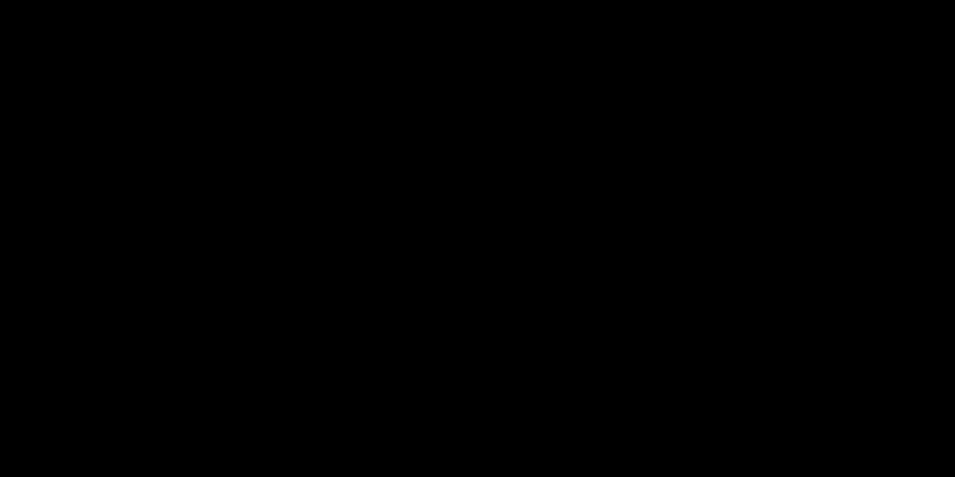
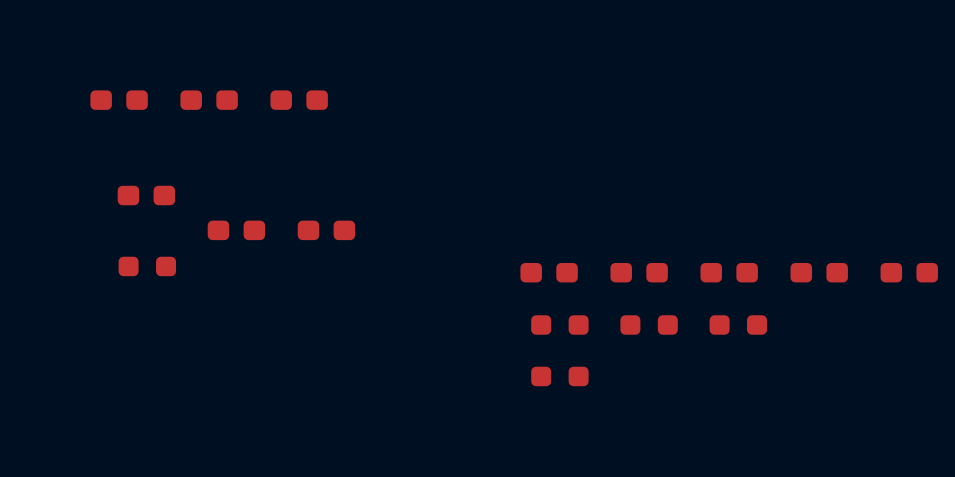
part: none -> (119, 100)
part: none -> (209, 100)
part: none -> (299, 100)
part: none -> (146, 195)
part: none -> (236, 230)
part: none -> (326, 230)
part: none -> (147, 266)
part: none -> (549, 272)
part: none -> (639, 272)
part: none -> (729, 272)
part: none -> (819, 272)
part: none -> (909, 272)
part: none -> (559, 324)
part: none -> (649, 324)
part: none -> (738, 324)
part: none -> (559, 376)

